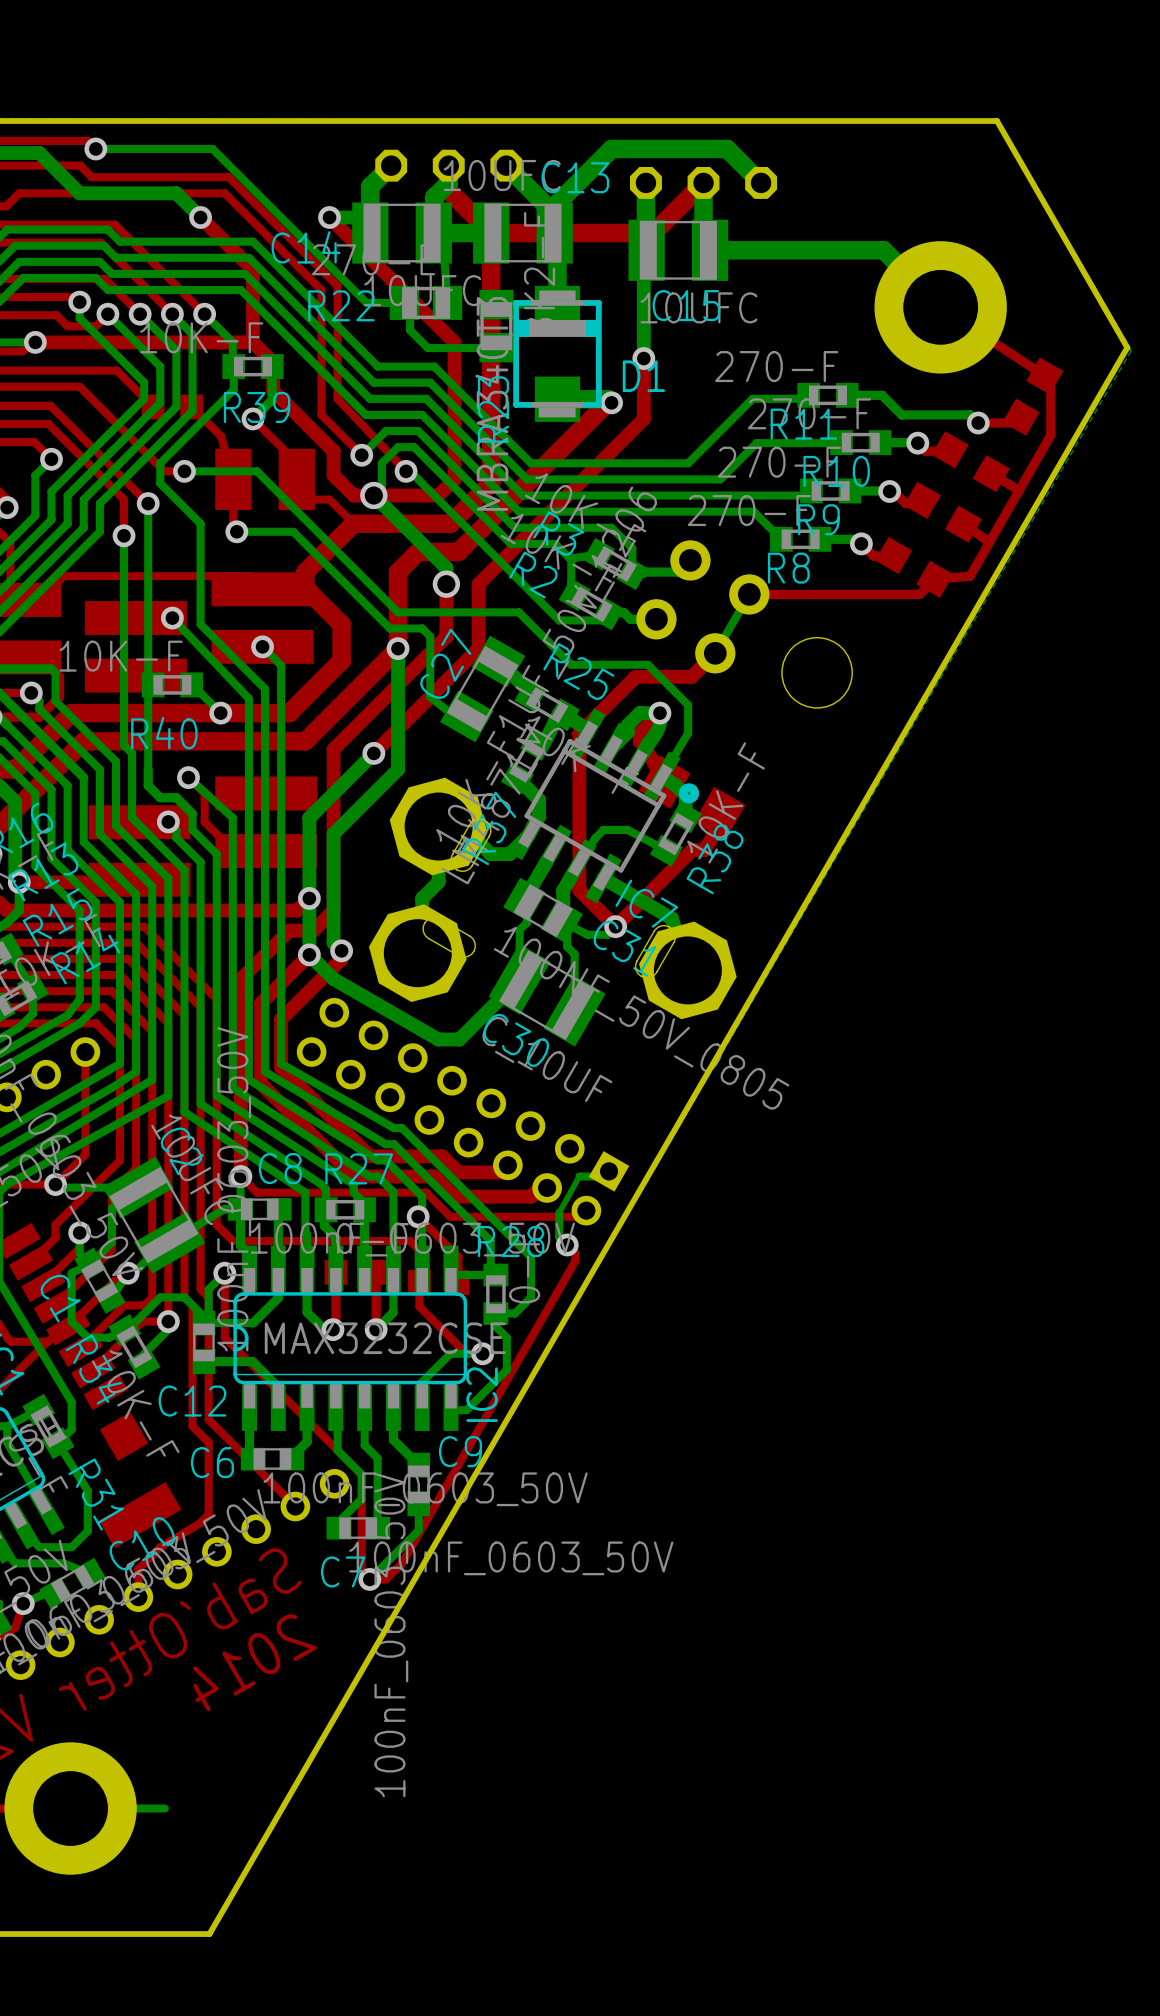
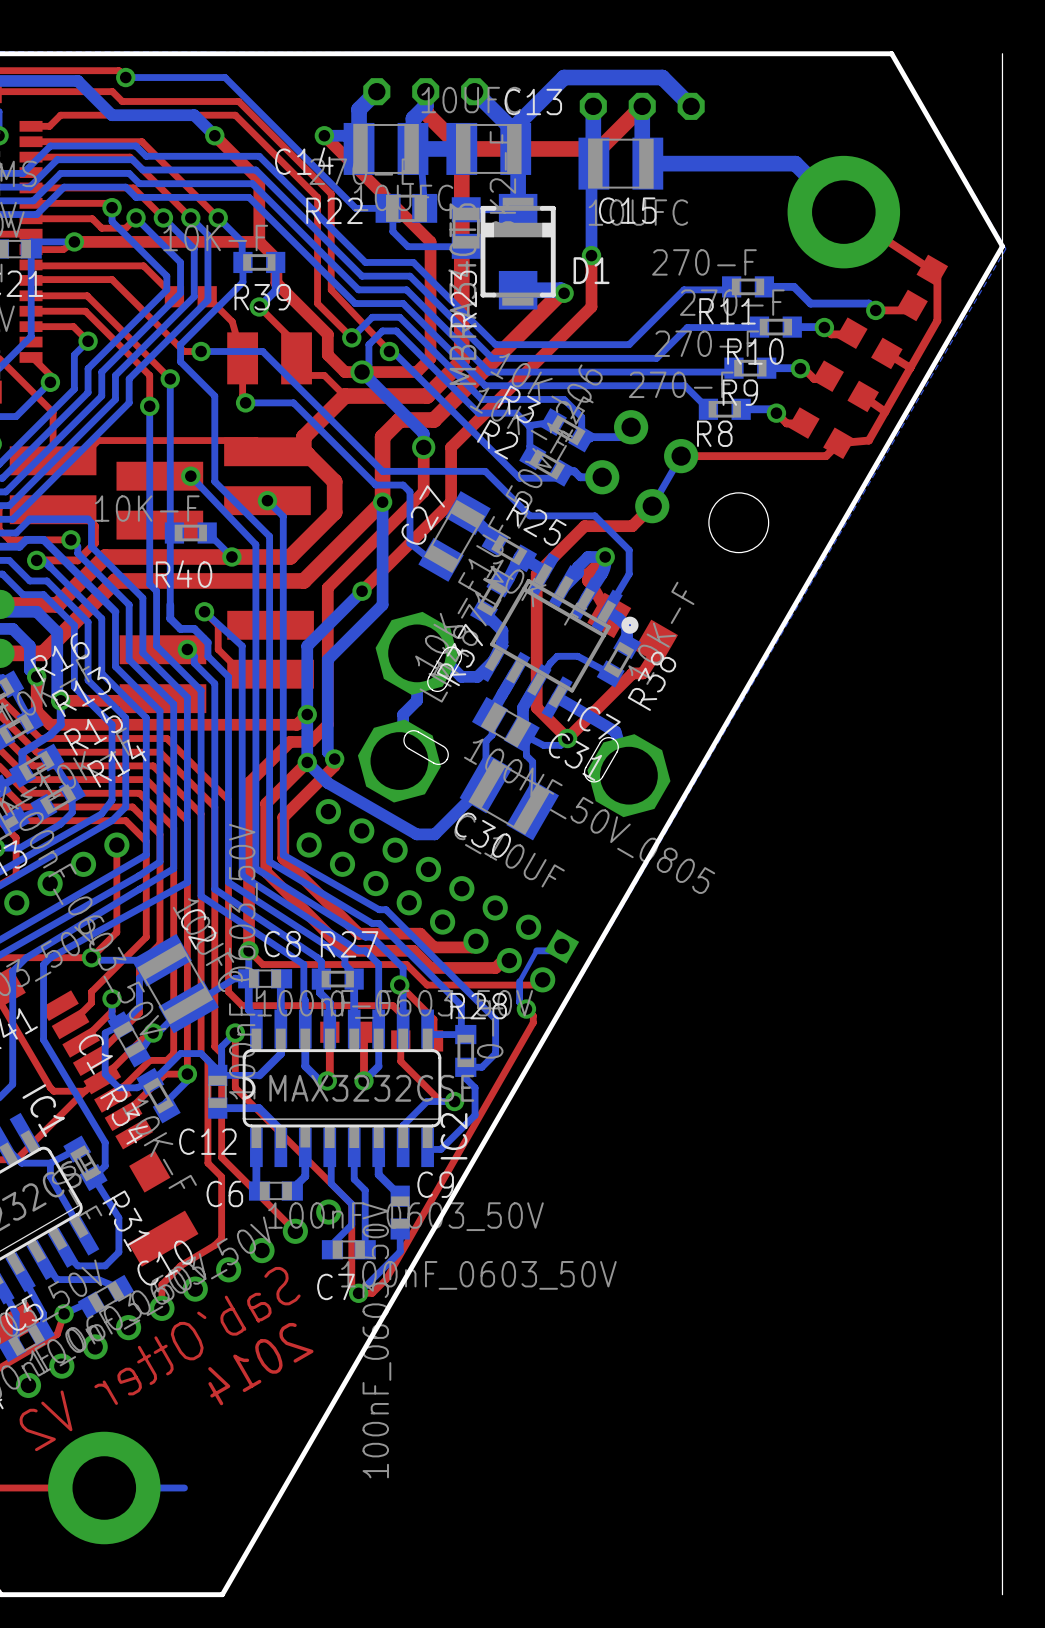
board edge: none -> (1002, 53) (1002, 1594)

